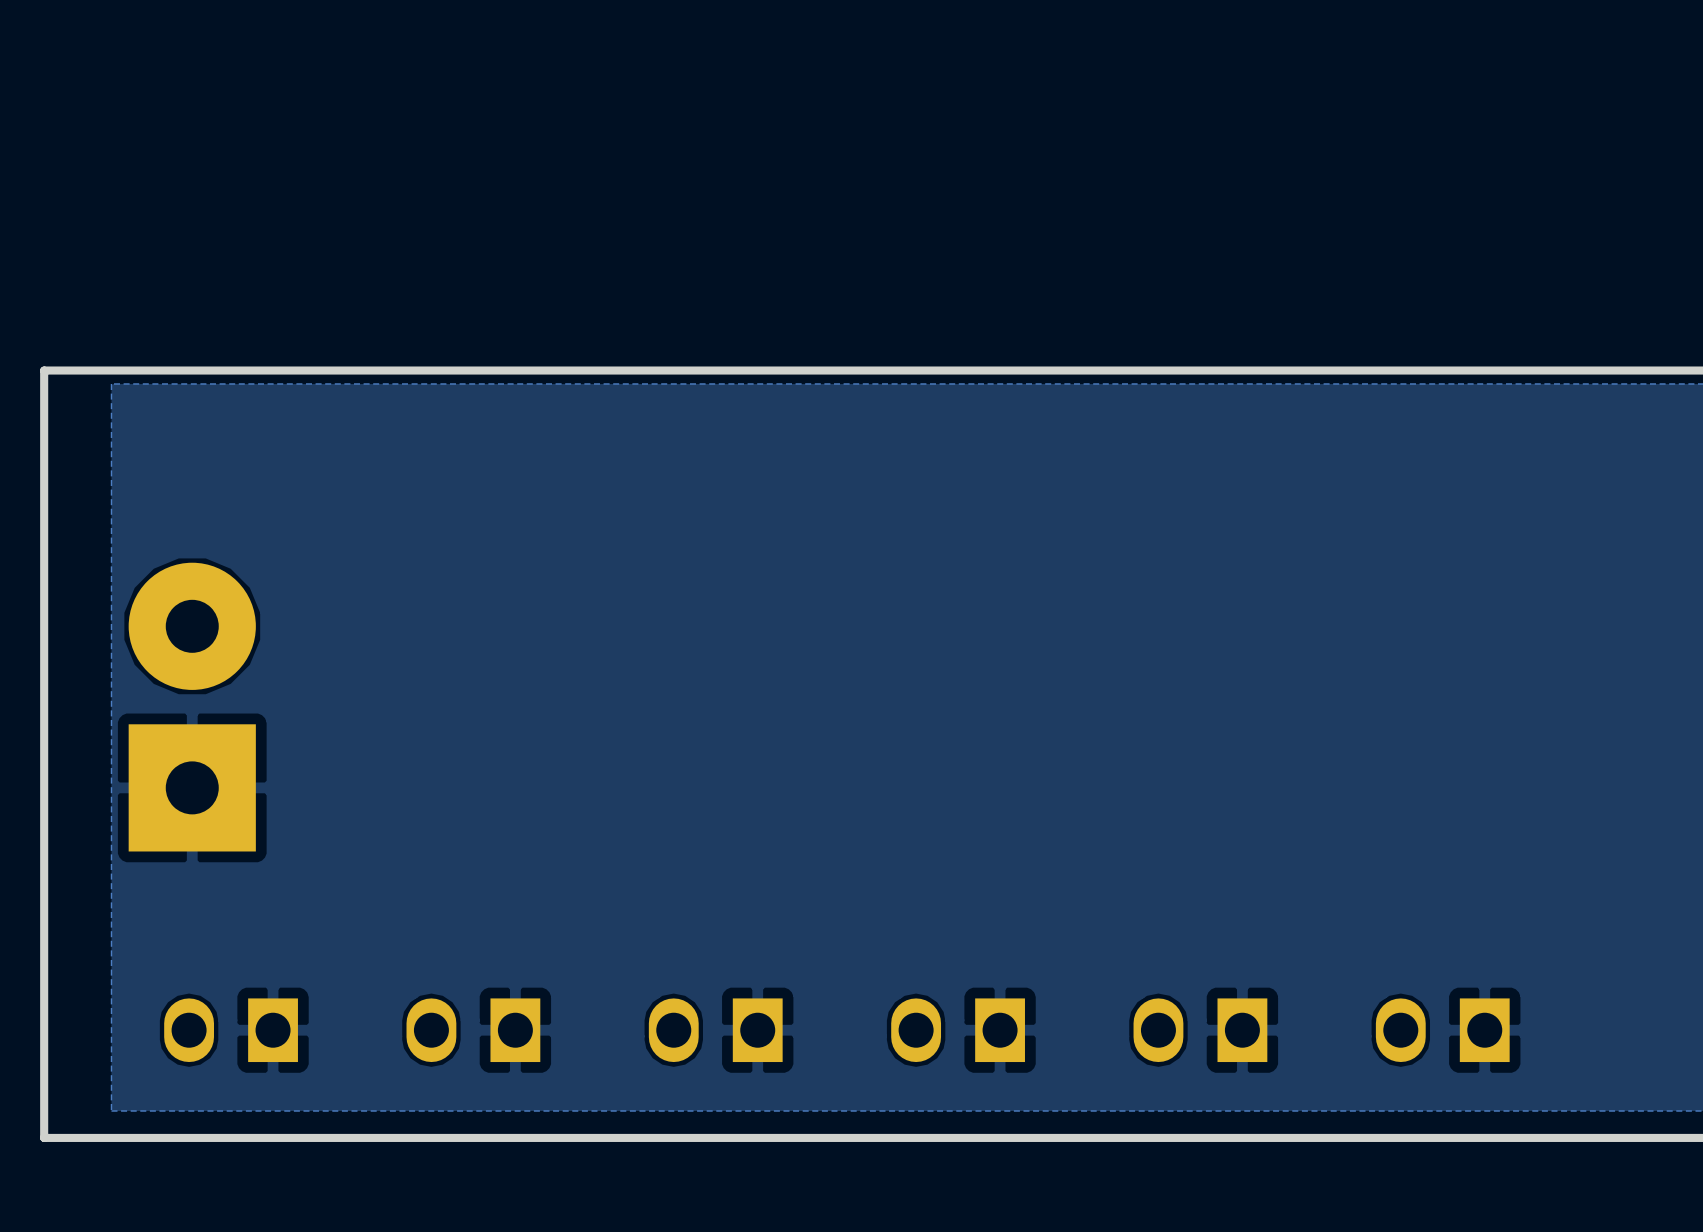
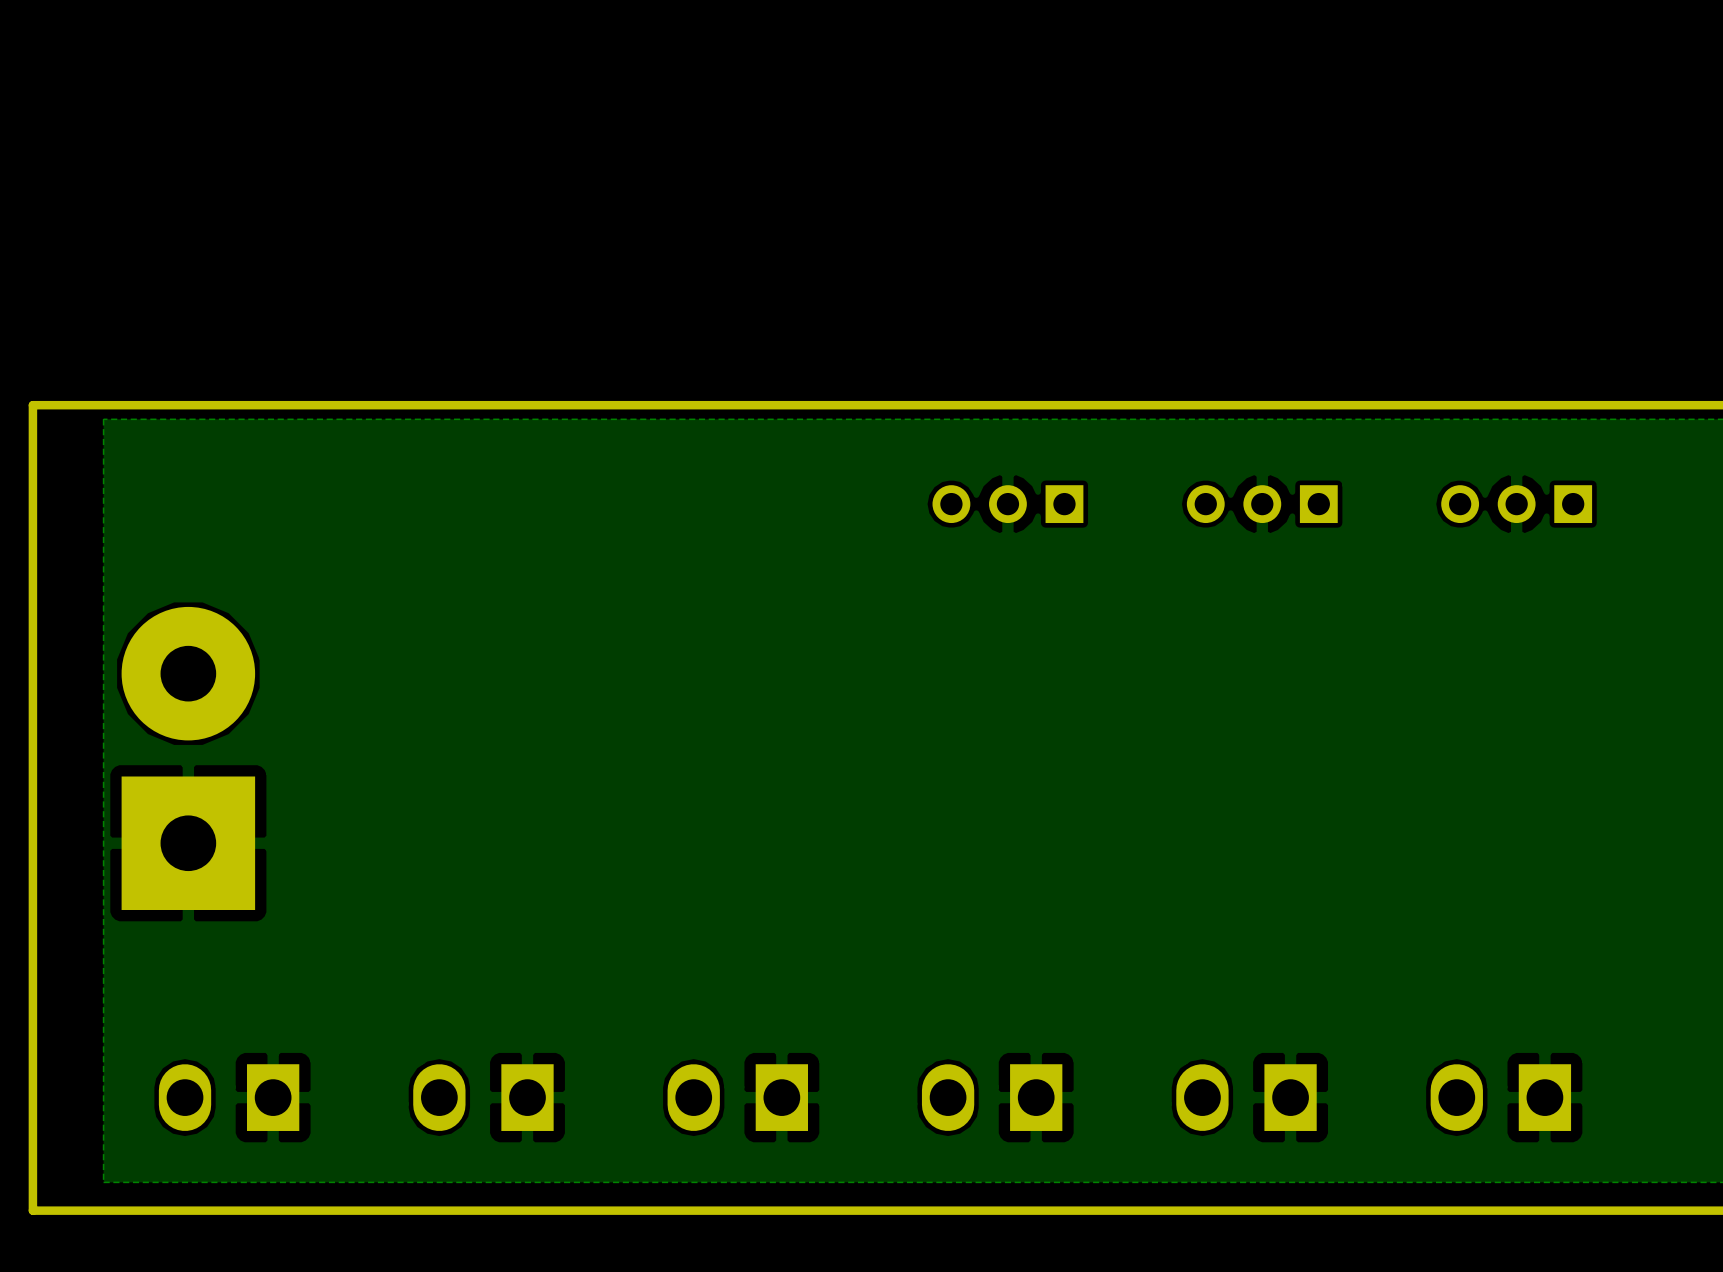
part: none -> (1007, 504)
part: none -> (1262, 504)
part: none -> (1516, 504)

